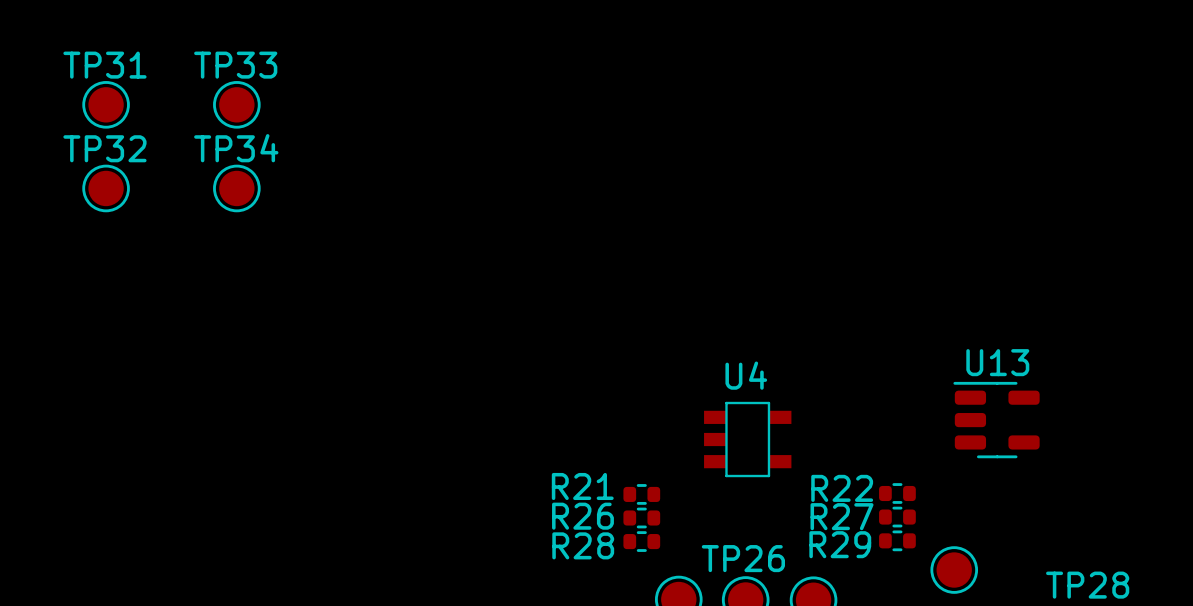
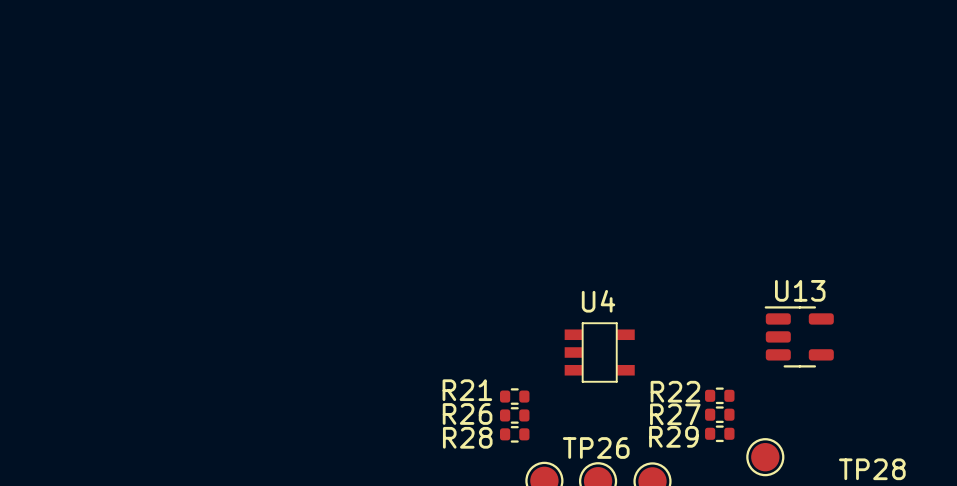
TP31: (106, 104) -> none
TP33: (236, 104) -> none
TP32: (106, 188) -> none
TP34: (236, 188) -> none

